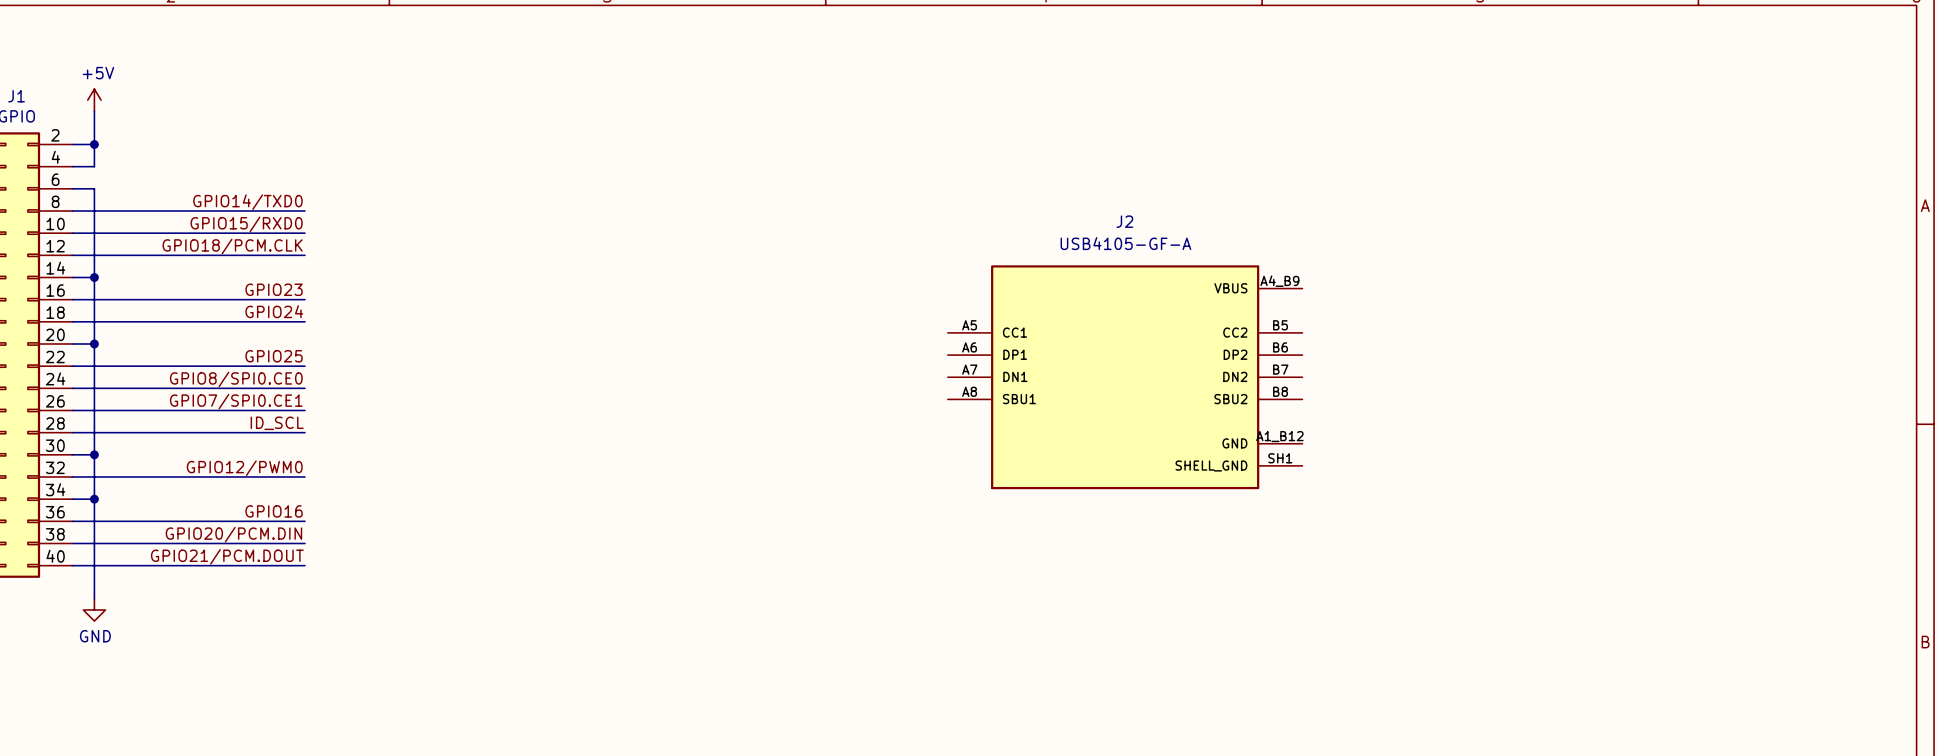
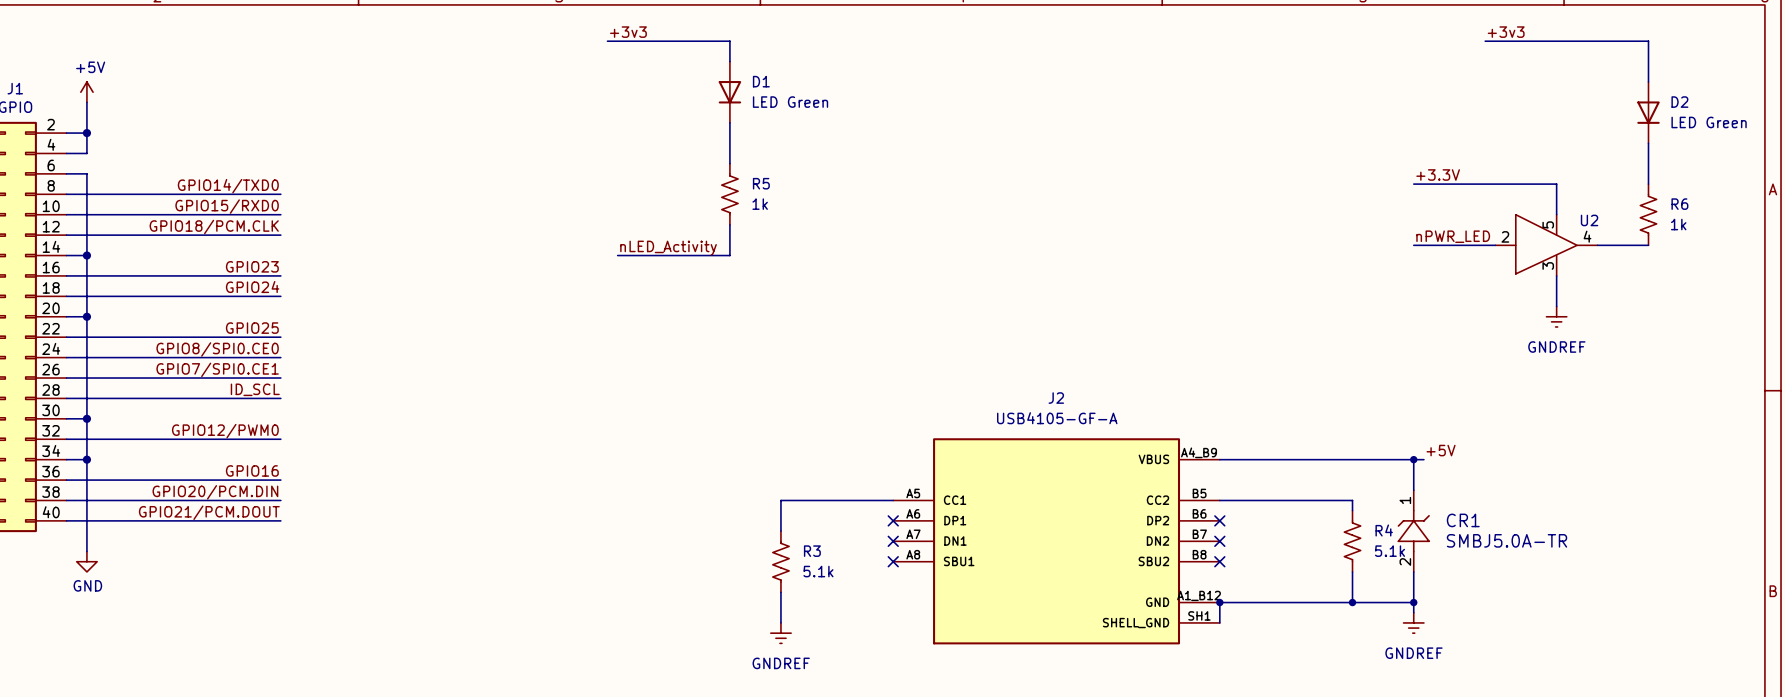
label: none -> +3v3 (628, 32)
label: none -> +3v3 (1506, 32)
wire: none -> (607, 41) (729, 41) (729, 61)
wire: none -> (1485, 41) (1648, 41) (1648, 82)
D1: none -> LED Green (729, 92)
D2: none -> LED Green (1648, 112)
wire: none -> (729, 122) (729, 163)
wire: none -> (1648, 143) (1648, 184)
label: none -> +3.3V (1438, 174)
wire: none -> (1413, 184) (1556, 184) (1556, 214)
R5: none -> 1k (729, 194)
R6: none -> 1k (1648, 214)
wire: none -> (729, 224) (729, 255) (617, 255)
label: none -> nPWR_LED (1453, 236)
wire: none -> (1413, 245) (1495, 245)
U2: none -> (1546, 245)
wire: none -> (1597, 245) (1648, 245)
label: none -> nLED_Activity (668, 248)
wire: none -> (1556, 275) (1556, 306)
power symbol: none -> GNDREF (1556, 316)
J2 position: (1125, 377) -> (1056, 541)
label: none -> +5V (1441, 450)
wire: none -> (1219, 459) (1423, 459)
wire: none -> (1413, 459) (1413, 490)
junction: none -> (1413, 459)
wire: none -> (893, 500) (780, 500) (780, 531)
wire: none -> (1219, 500) (1352, 500) (1352, 510)
no-connect mark: none -> (893, 520)
no-connect mark: none -> (1219, 520)
CR1: none -> SMBJ5.0A-TR (1413, 531)
no-connect mark: none -> (893, 541)
no-connect mark: none -> (1219, 541)
R4: none -> 5.1k (1352, 541)
R3: none -> 5.1k (780, 561)
no-connect mark: none -> (893, 561)
no-connect mark: none -> (1219, 561)
wire: none -> (1352, 571) (1352, 602)
wire: none -> (1413, 571) (1413, 612)
wire: none -> (780, 592) (780, 622)
junction: none -> (1219, 602)
junction: none -> (1352, 602)
wire: none -> (1413, 602) (1219, 602) (1219, 622)
junction: none -> (1413, 602)
power symbol: none -> GNDREF (1413, 622)
power symbol: none -> GNDREF (780, 633)

